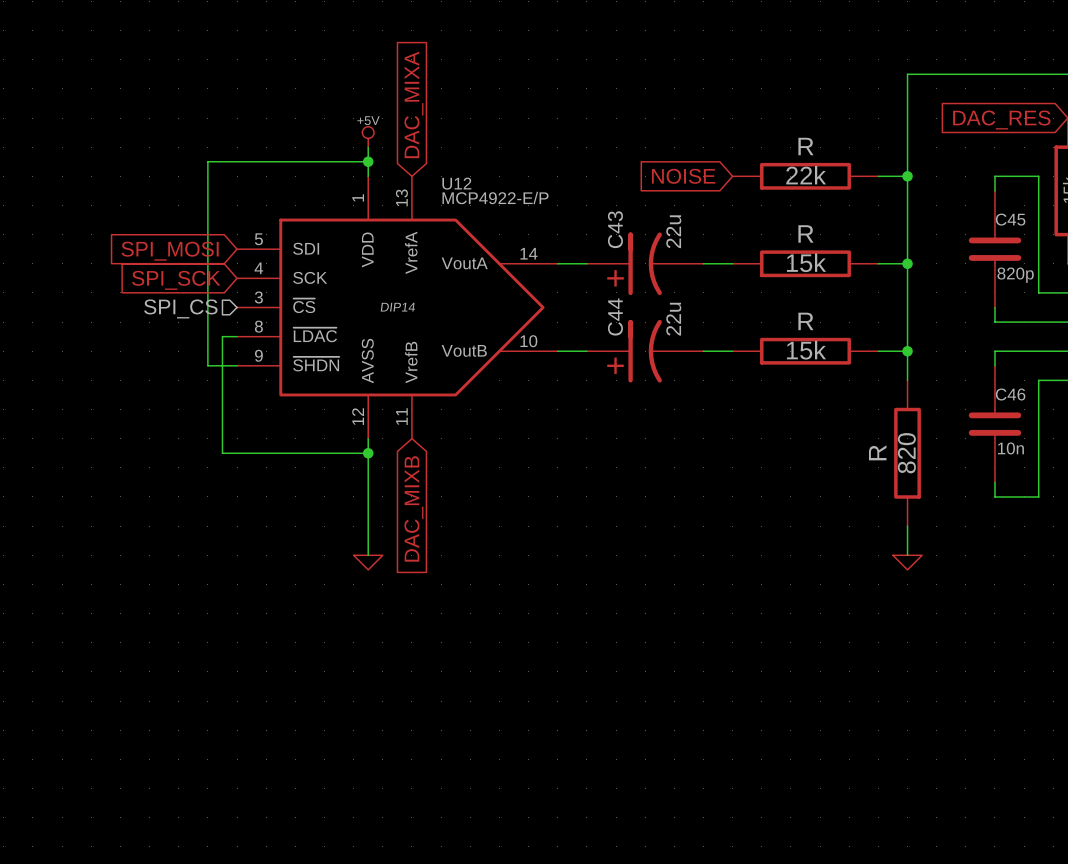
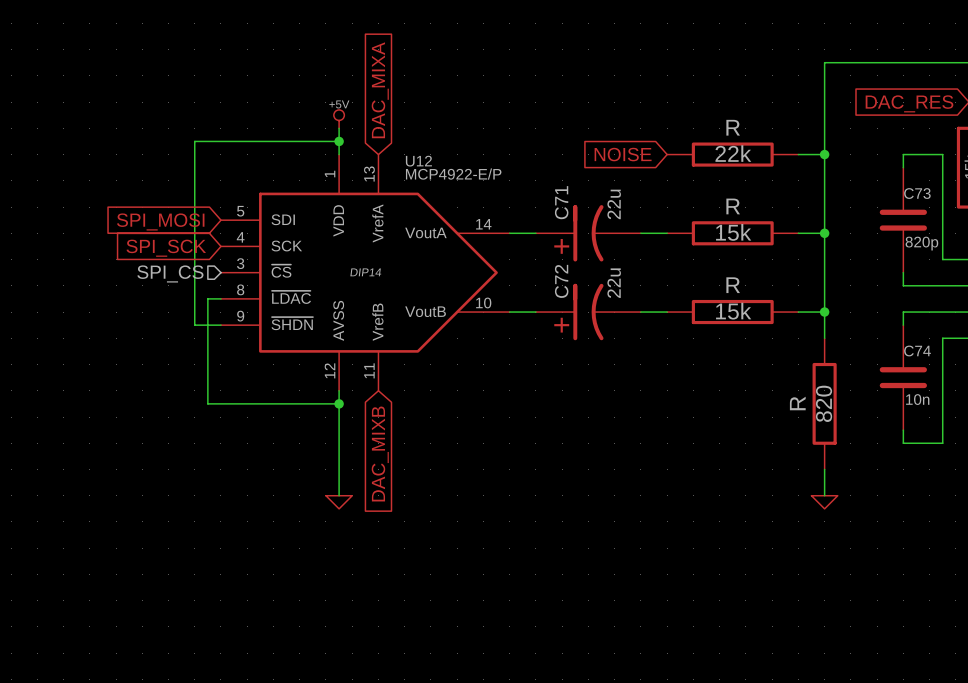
C45 name: C45 (1010, 219) -> C73 (917, 193)
C43 name: C43 (615, 229) -> C71 (561, 202)
C44 name: C44 (615, 316) -> C72 (561, 281)
C46 name: C46 (1010, 394) -> C74 (917, 351)

